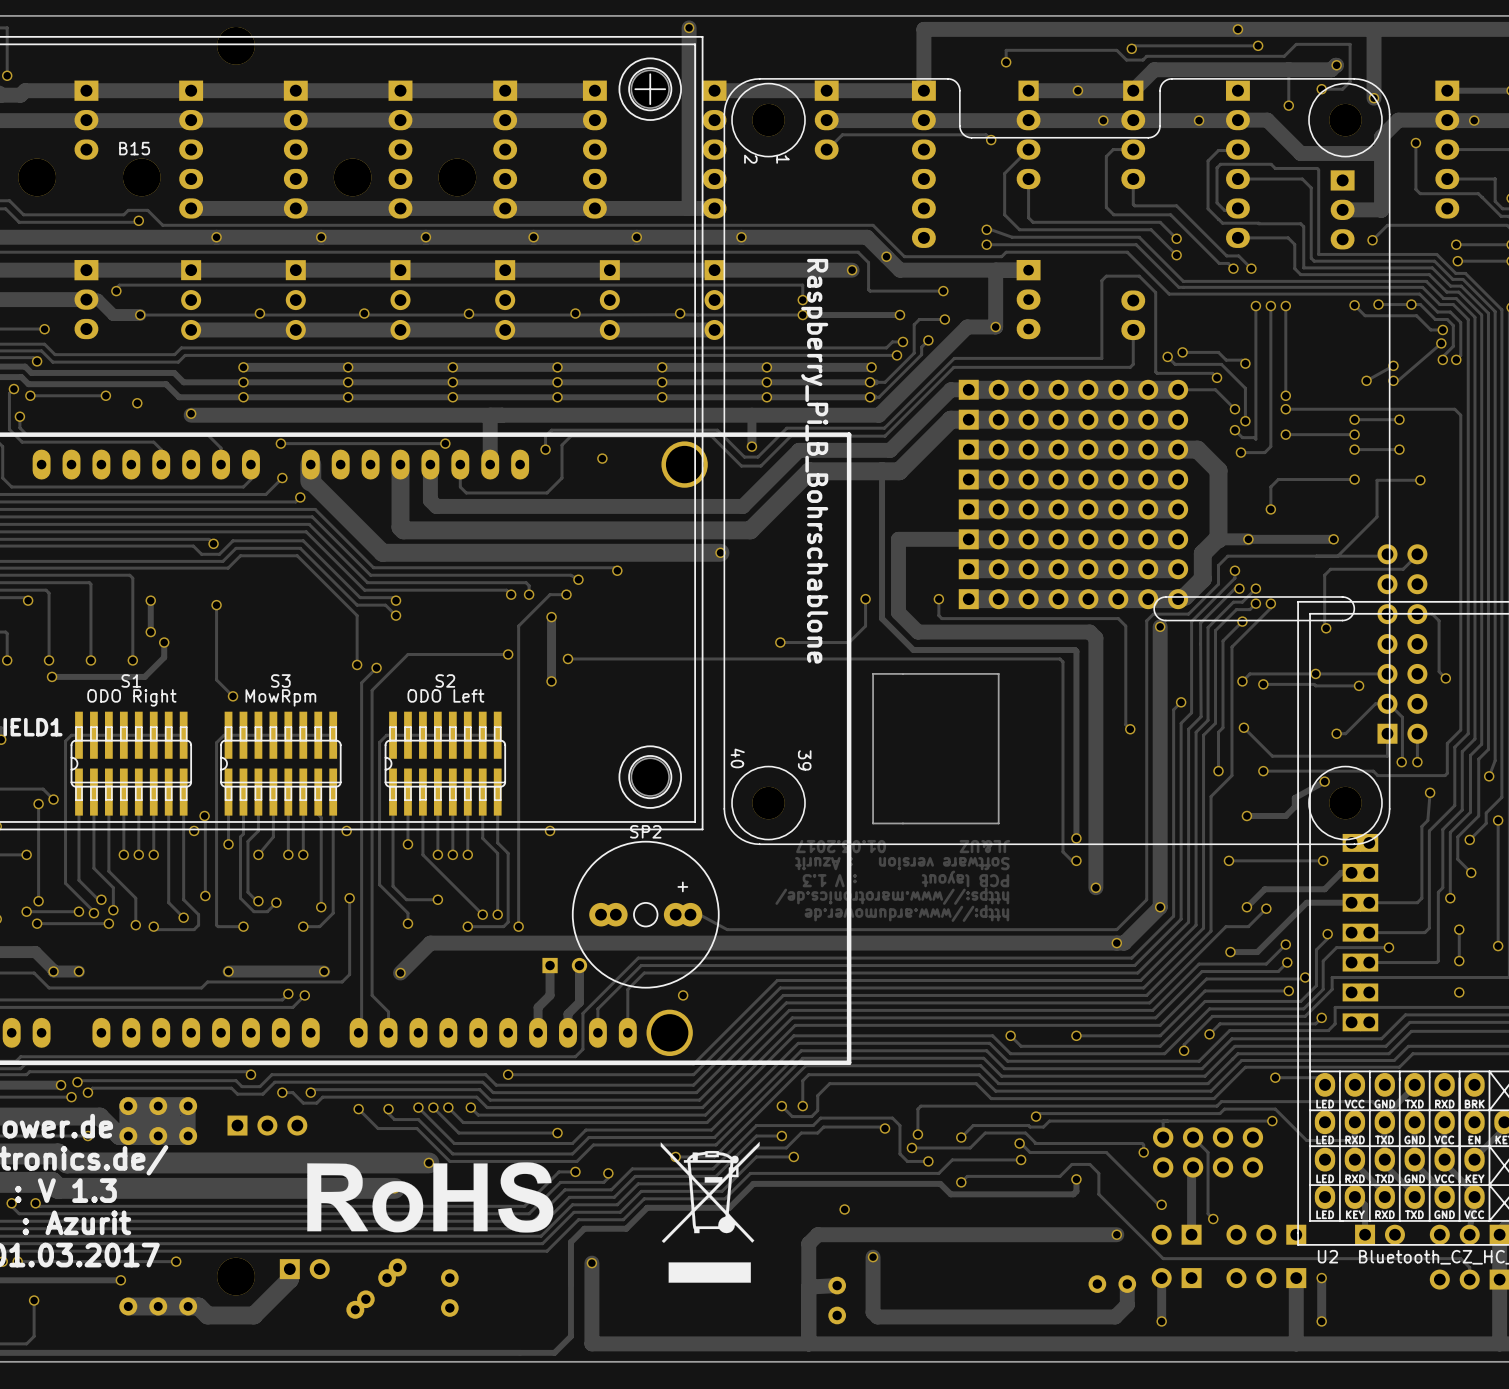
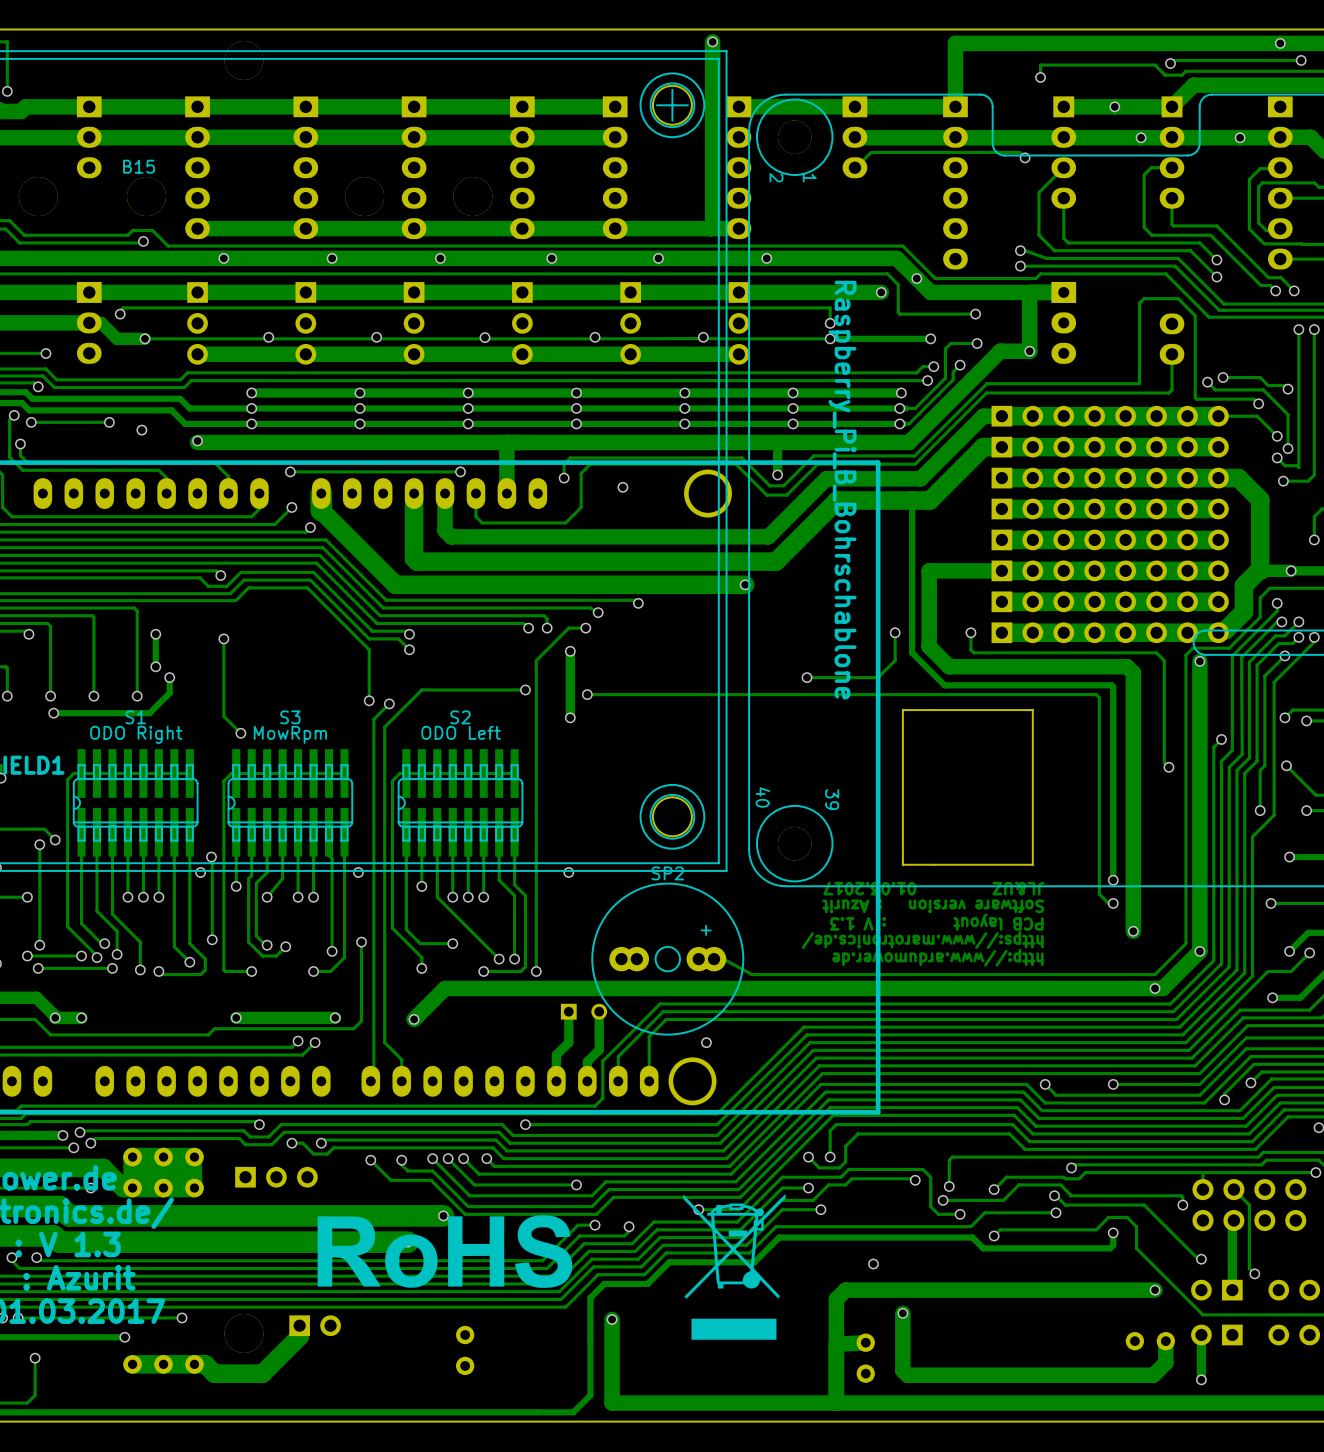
part: (376, 1288) -> none

